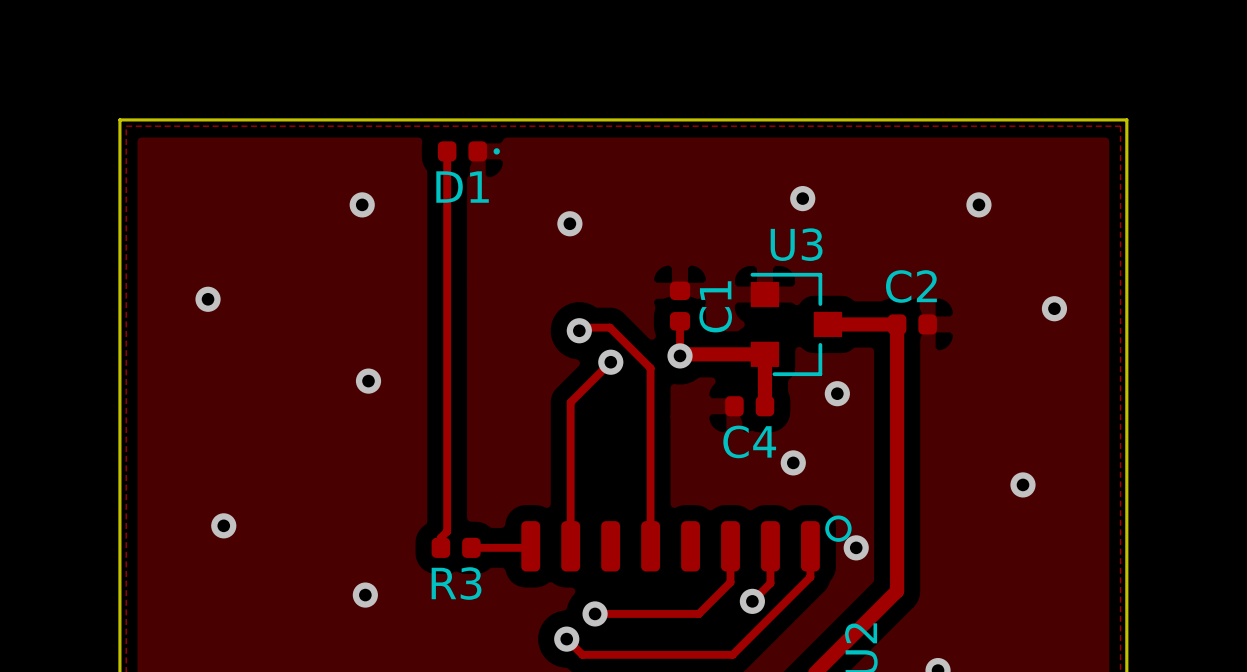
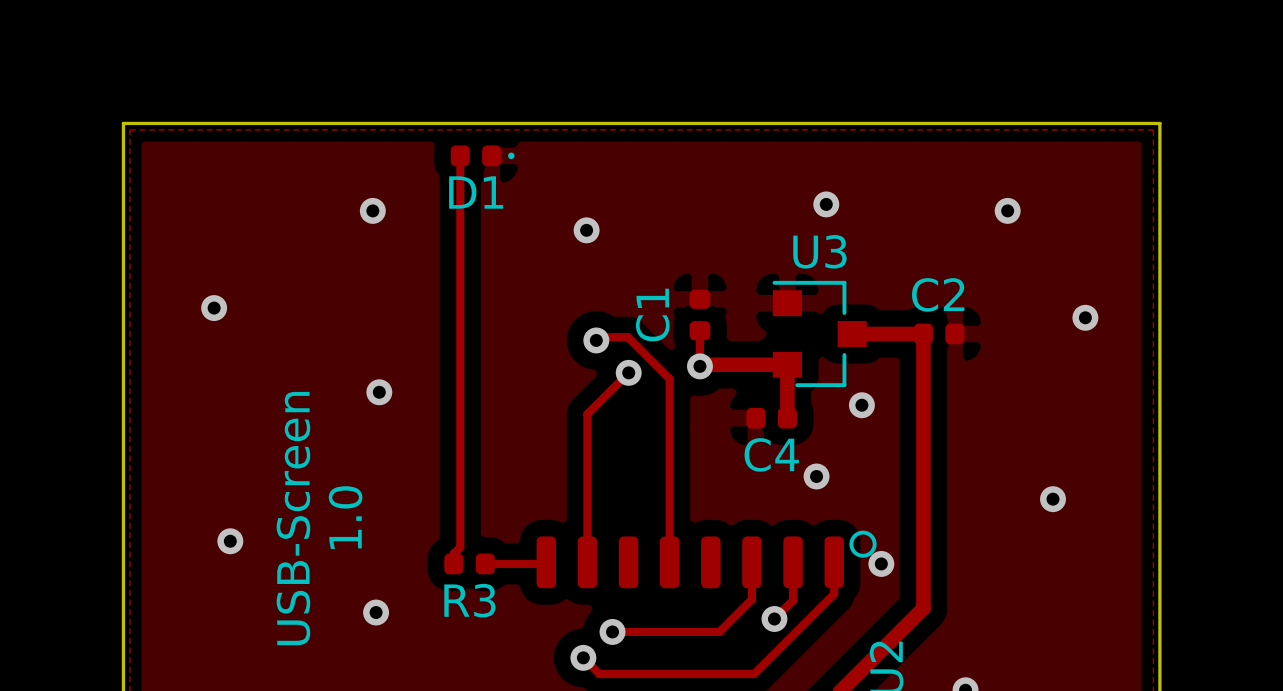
C1 name position: C1 (715, 306) -> C1 (652, 315)
text: none -> 1.0 (345, 517)
text: none -> USB-Screen (293, 518)

